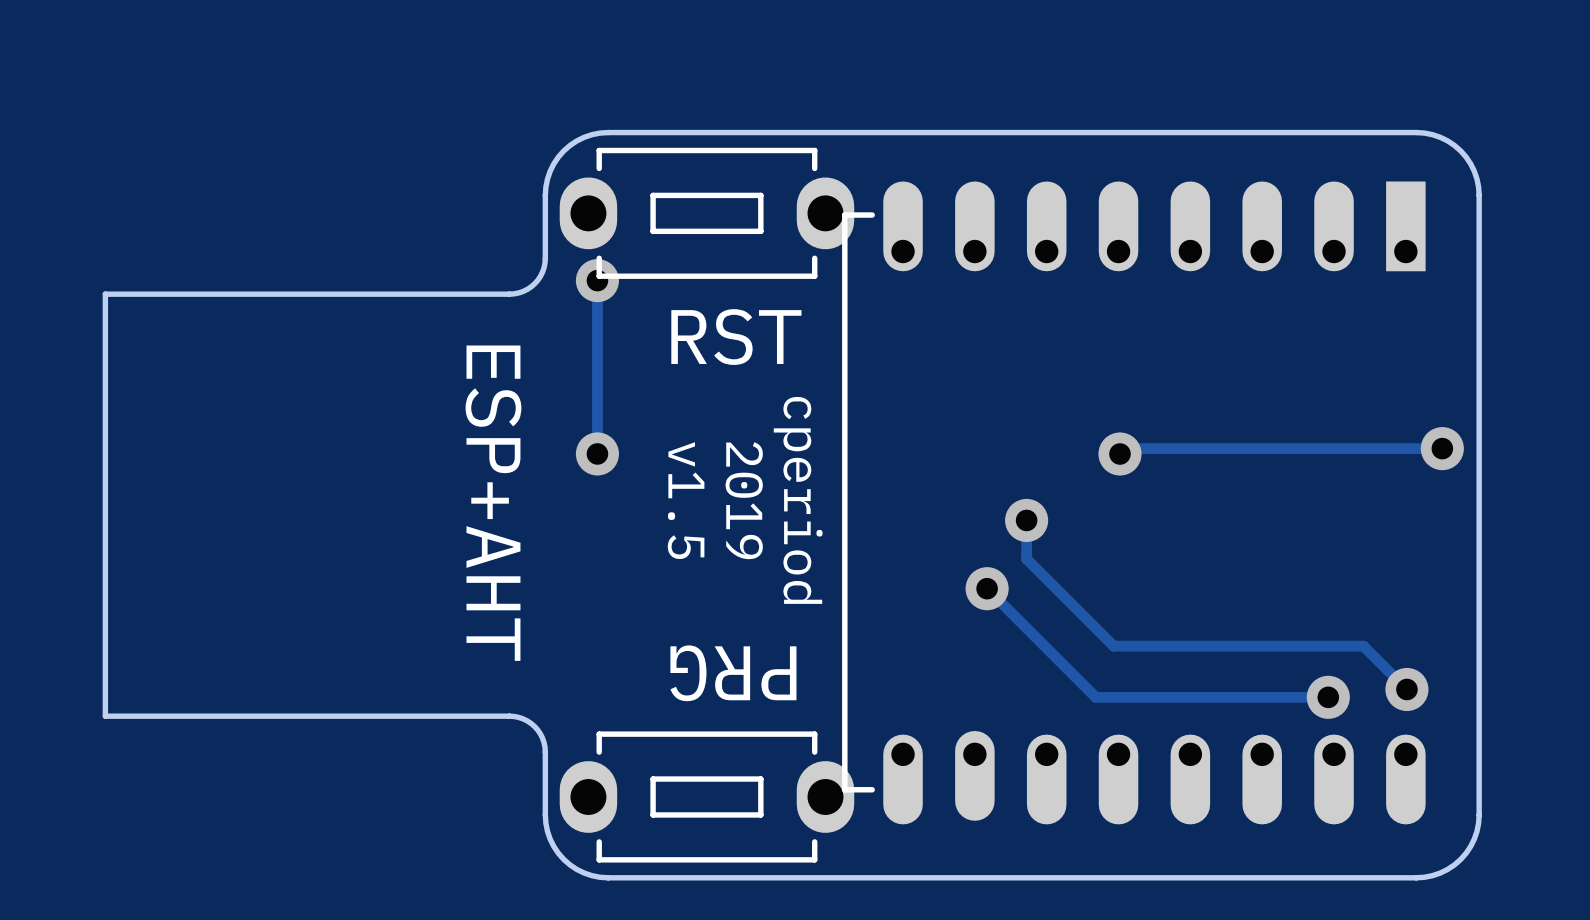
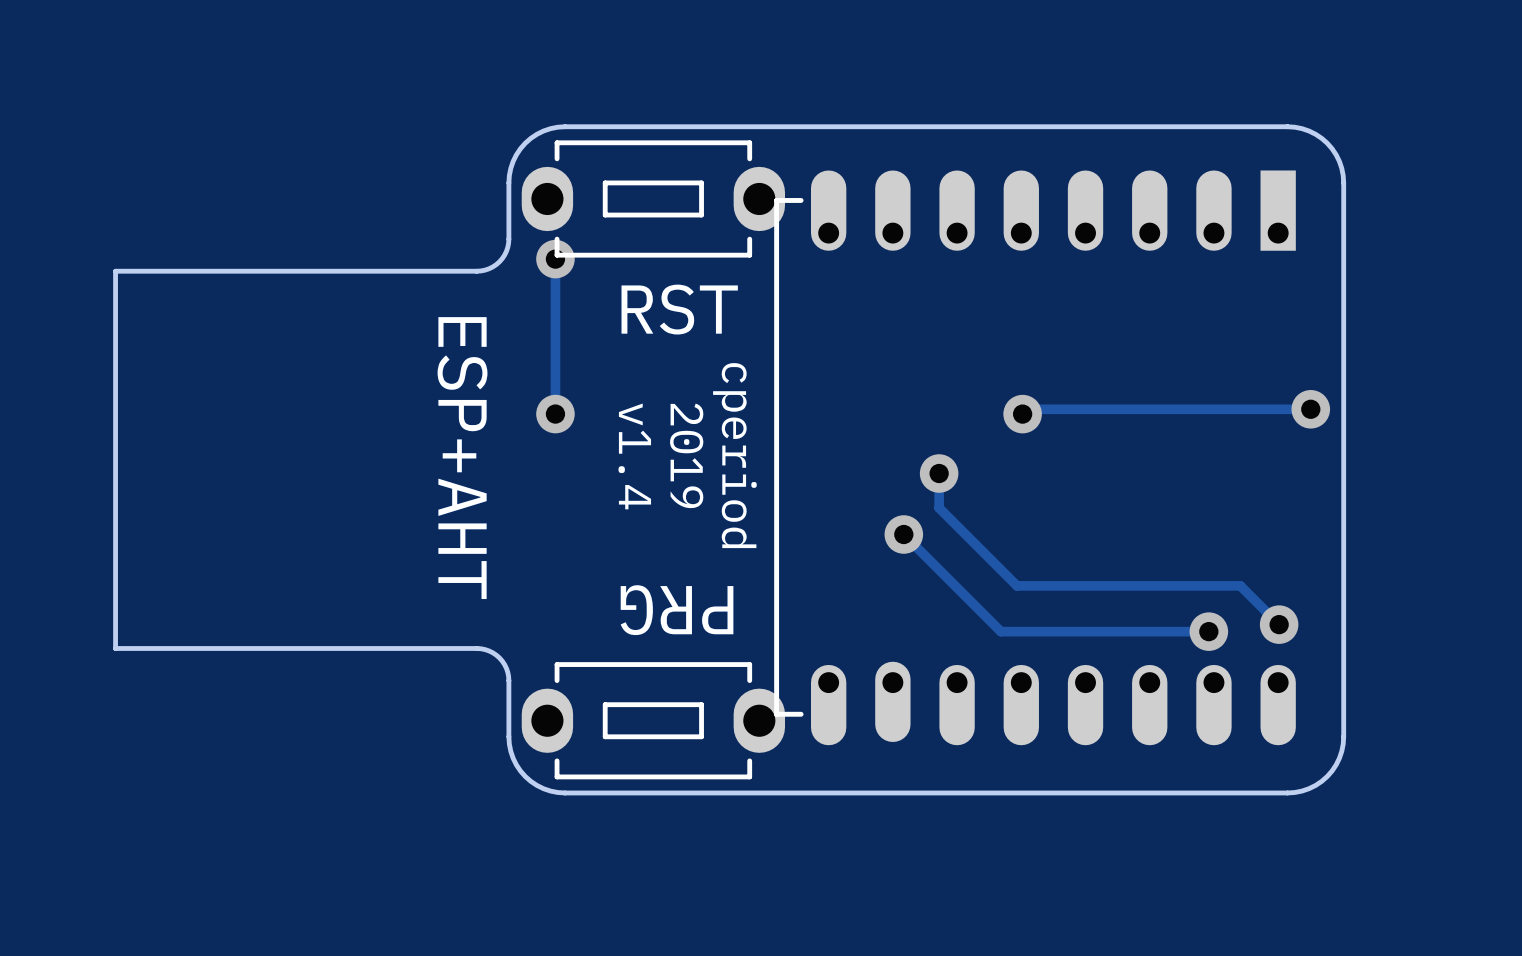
text: v1.5 (686, 500) -> none
text: none -> v1.4 (634, 456)

